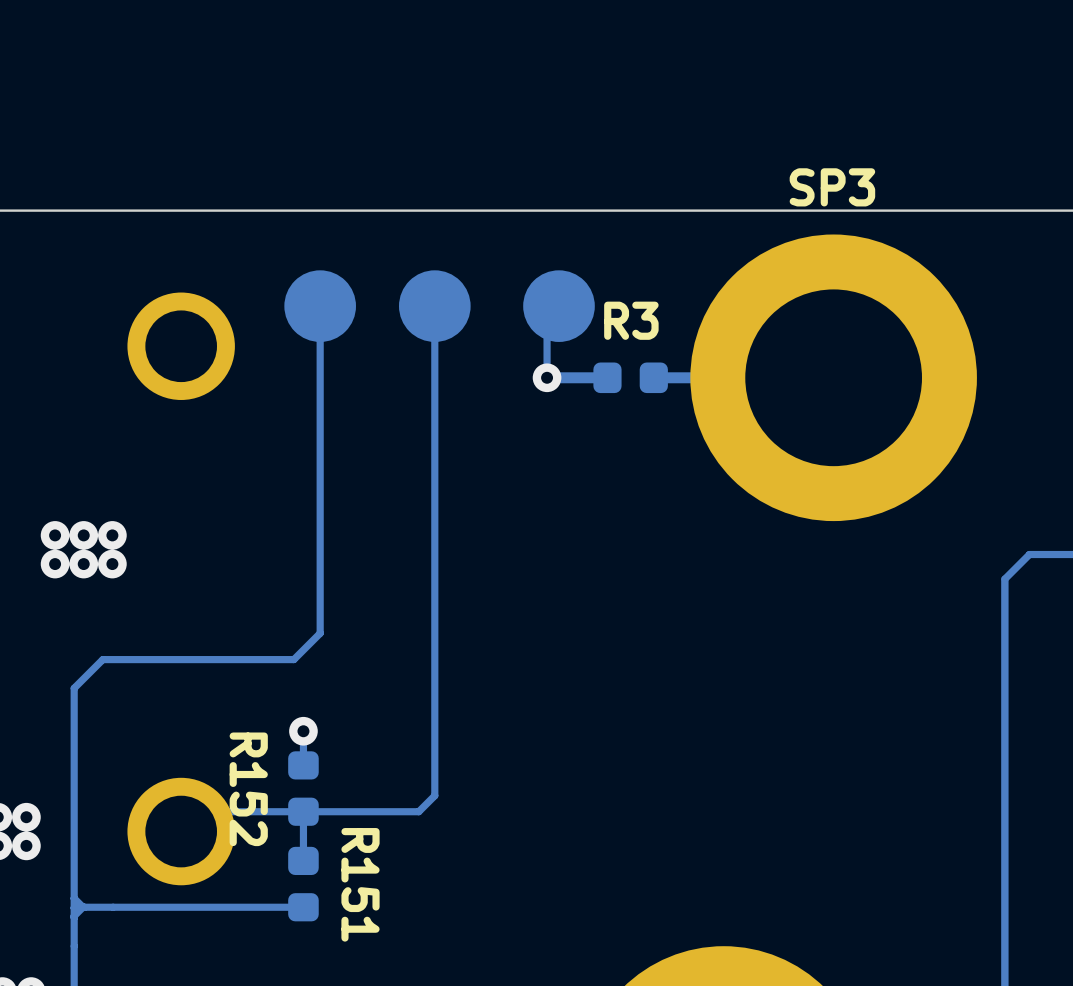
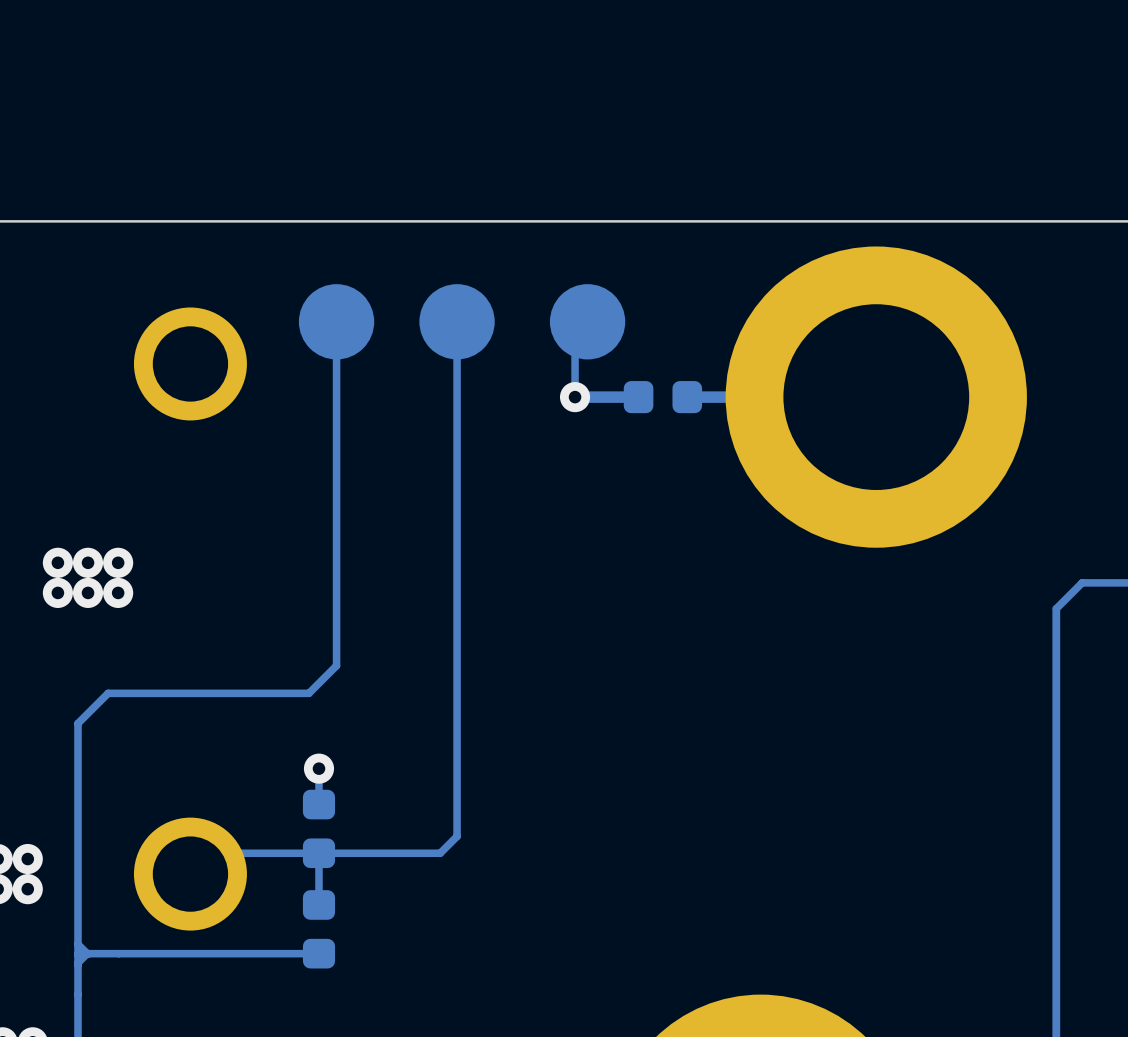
SP3 name: SP3 (832, 187) -> none
R3 name: R3 (631, 320) -> none
R152 name: R152 (248, 789) -> none
R151 name: R151 (360, 884) -> none

